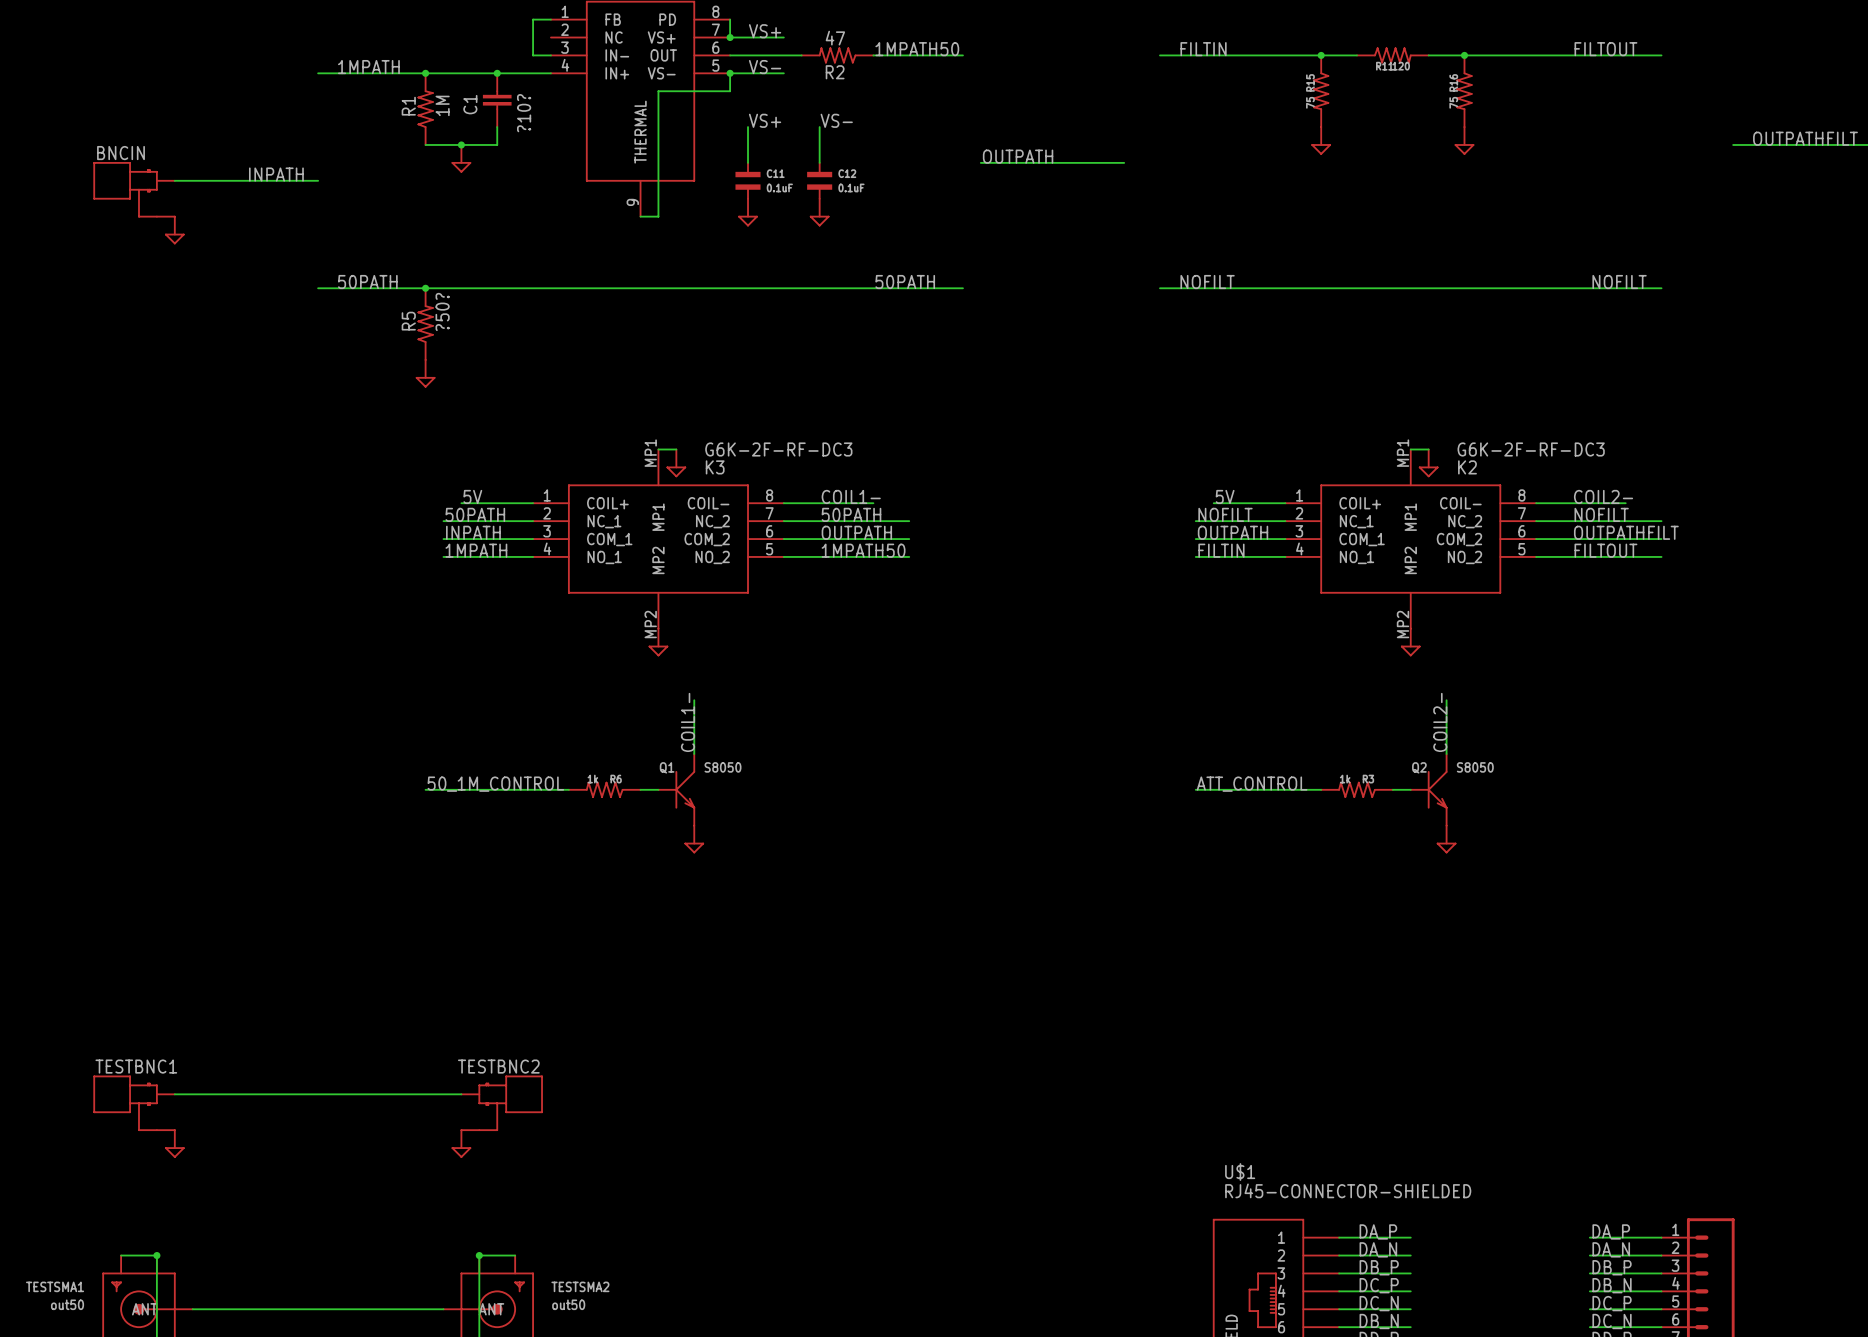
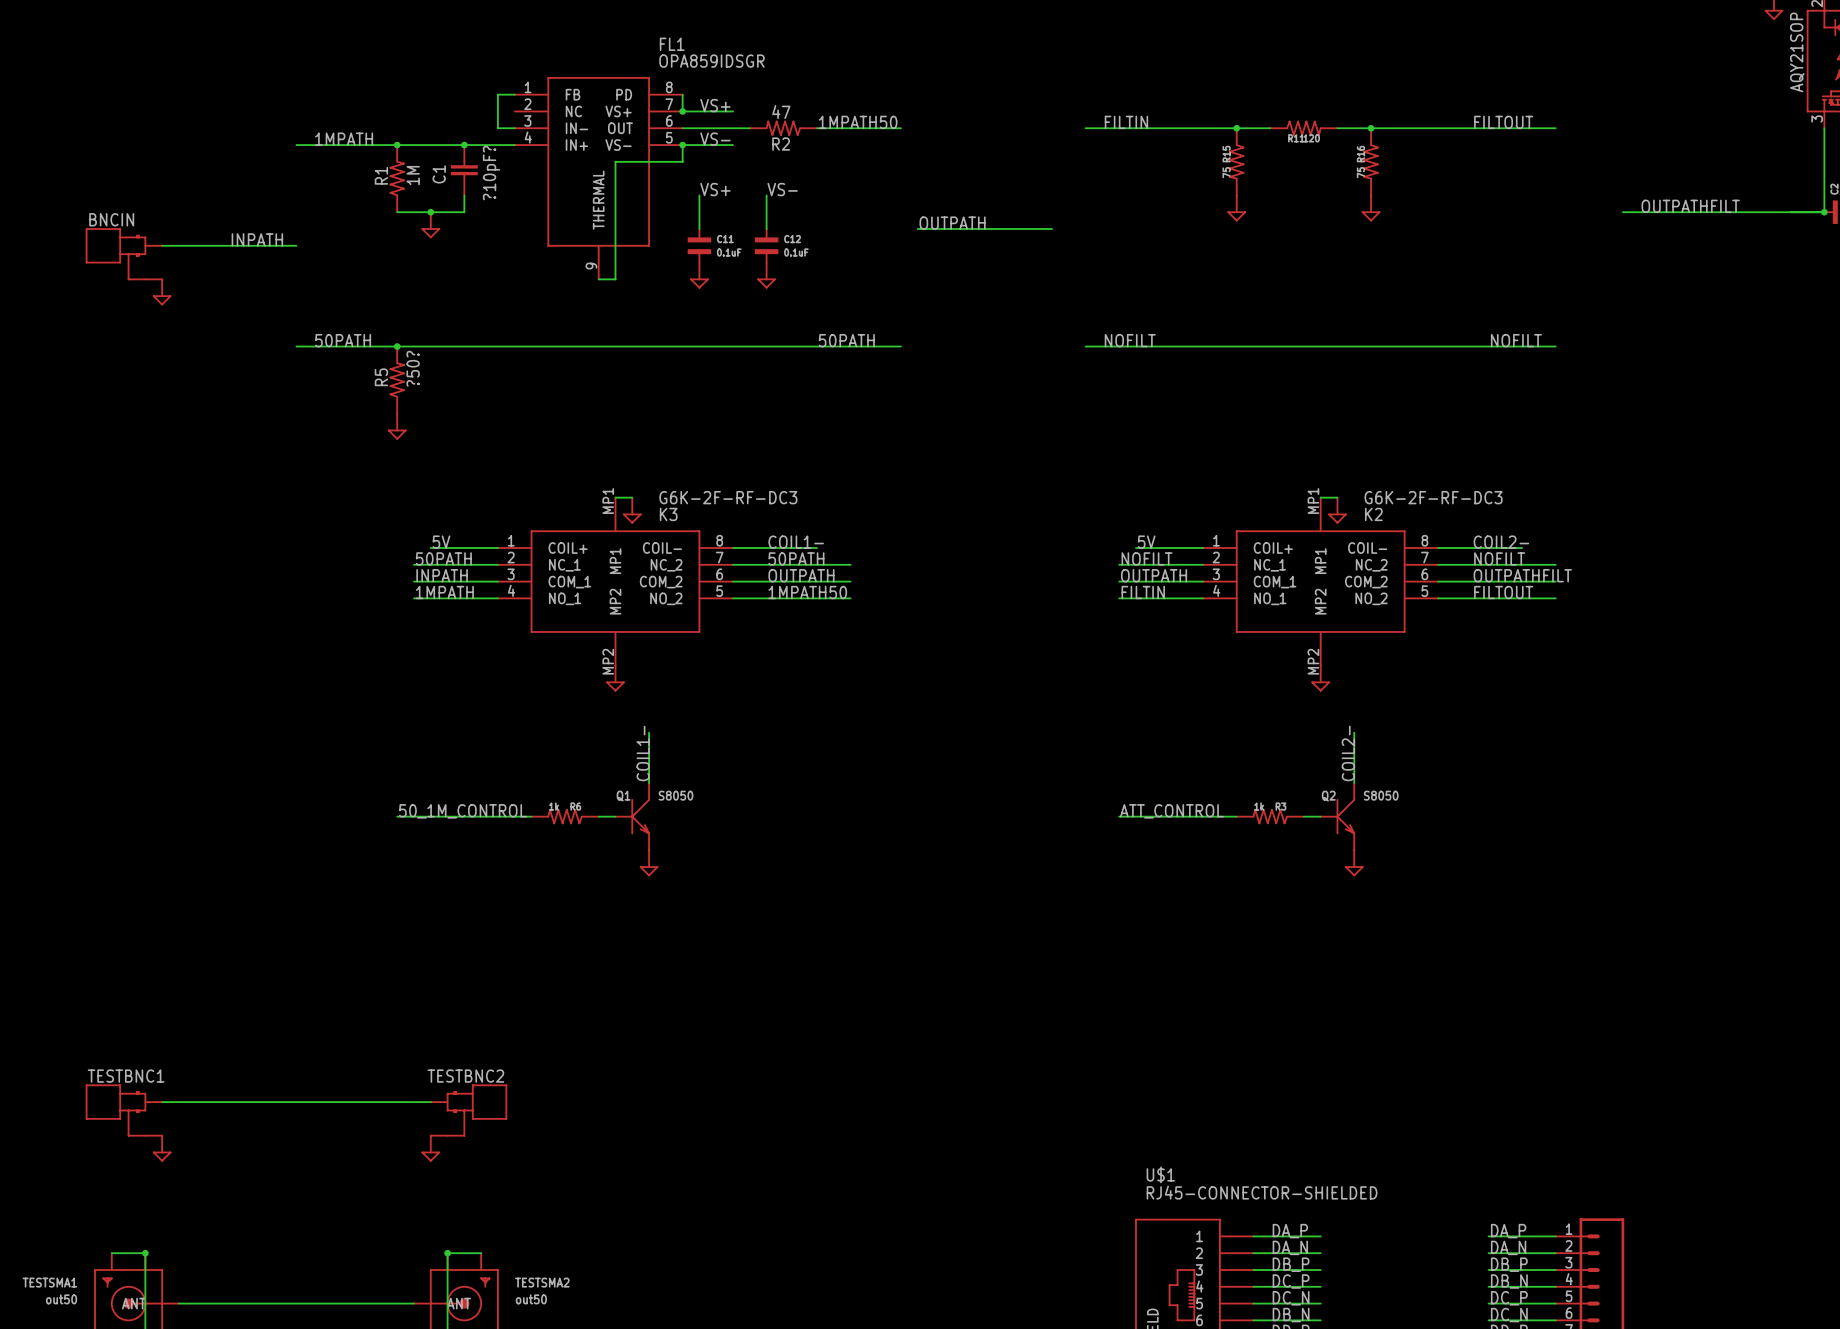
C1 value: ?10? (524, 113) -> ?10pF? (491, 173)

